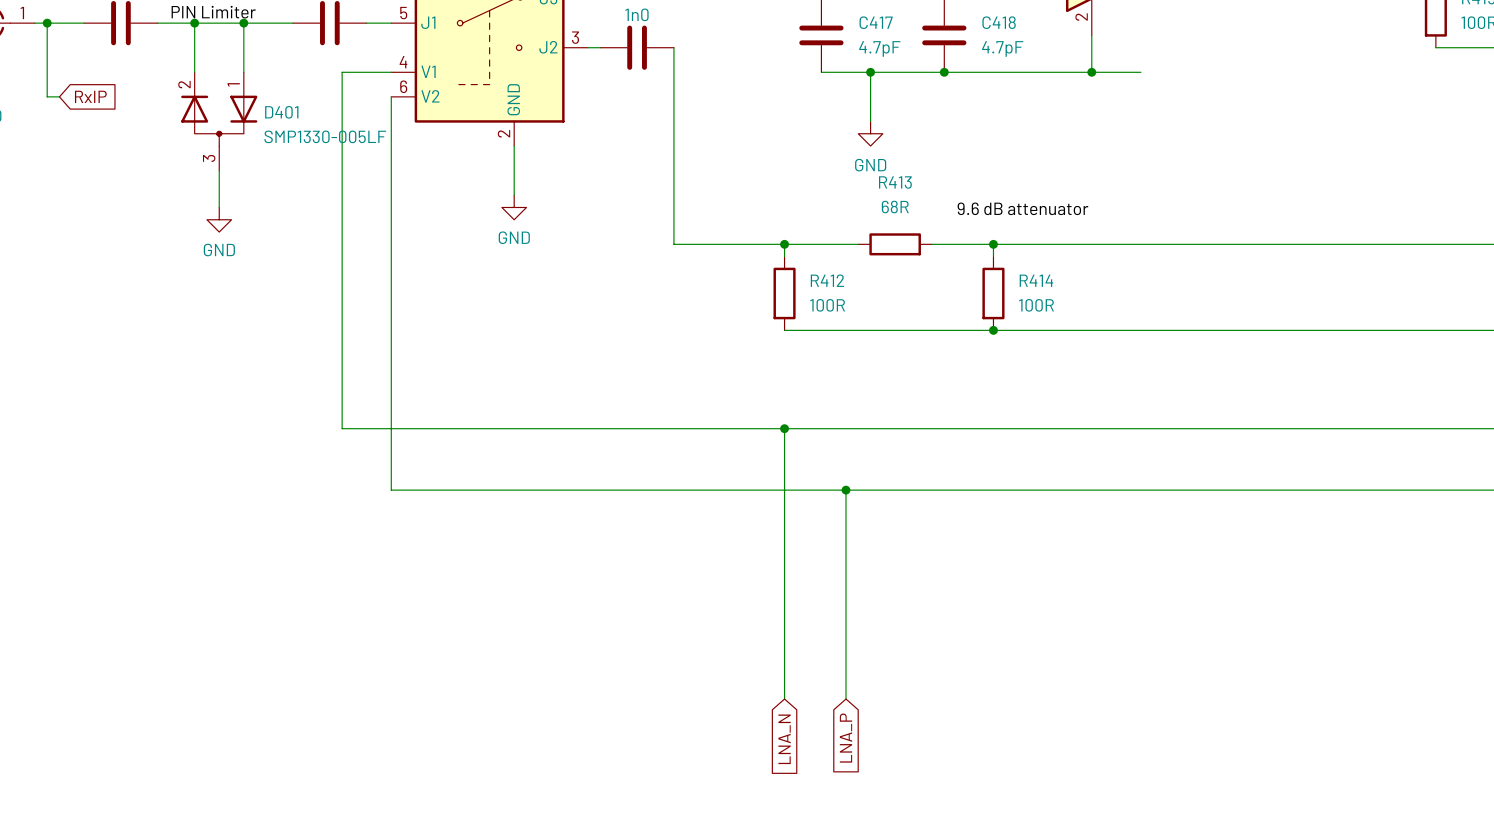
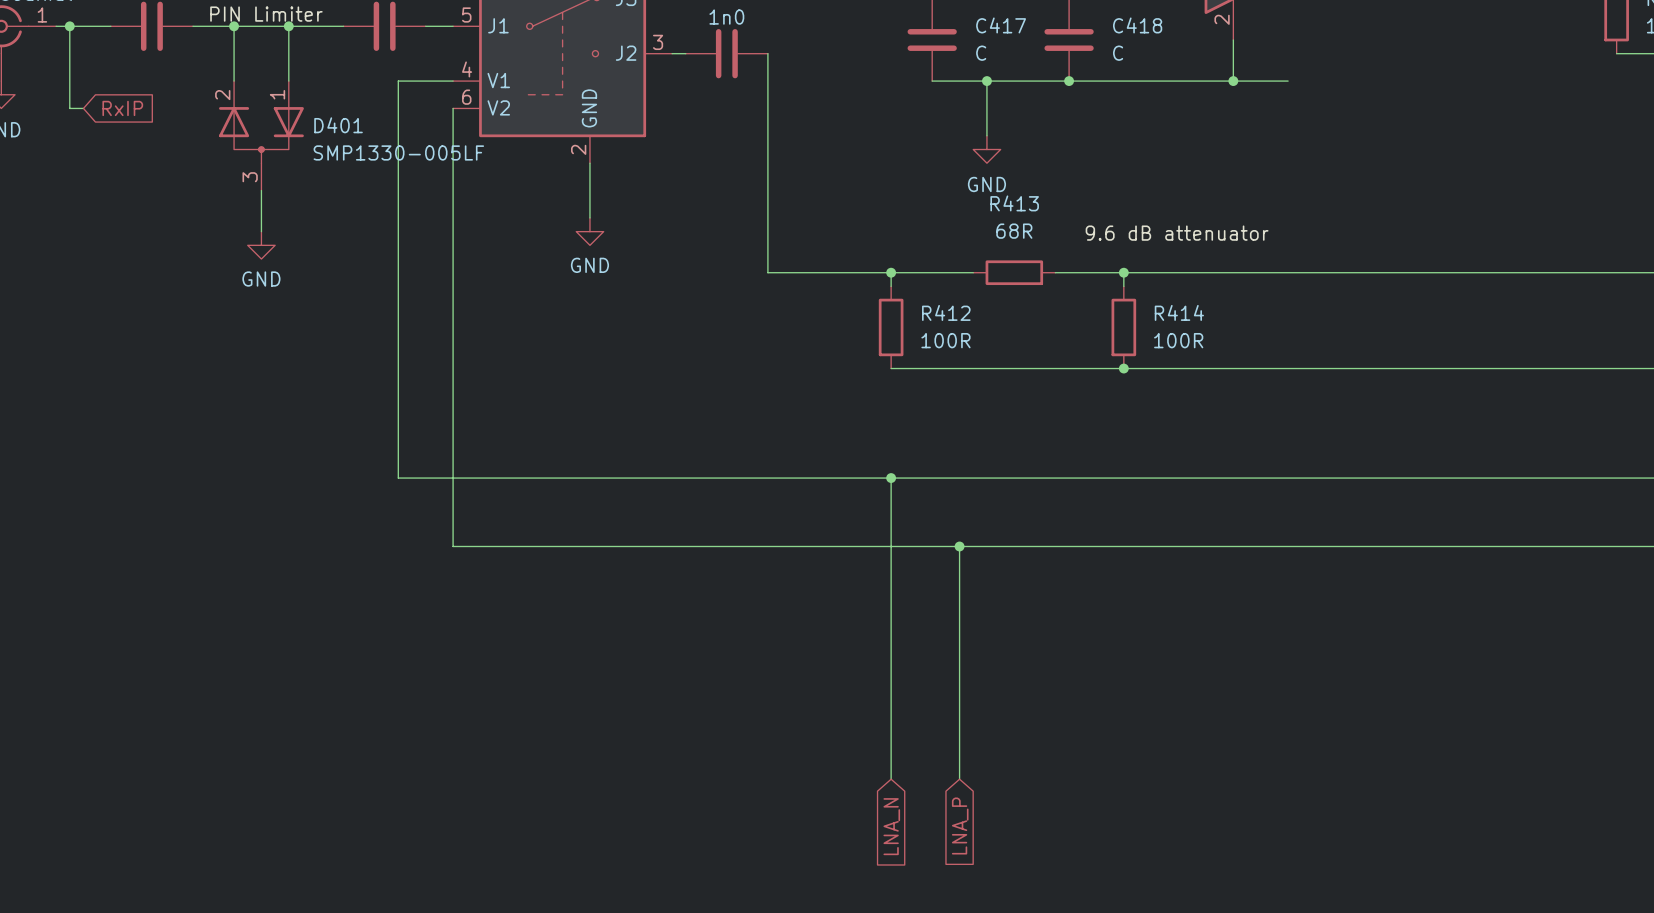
C417 value: 4.7pF (879, 48) -> C (981, 53)
C418 value: 4.7pF (1002, 48) -> C (1118, 53)

